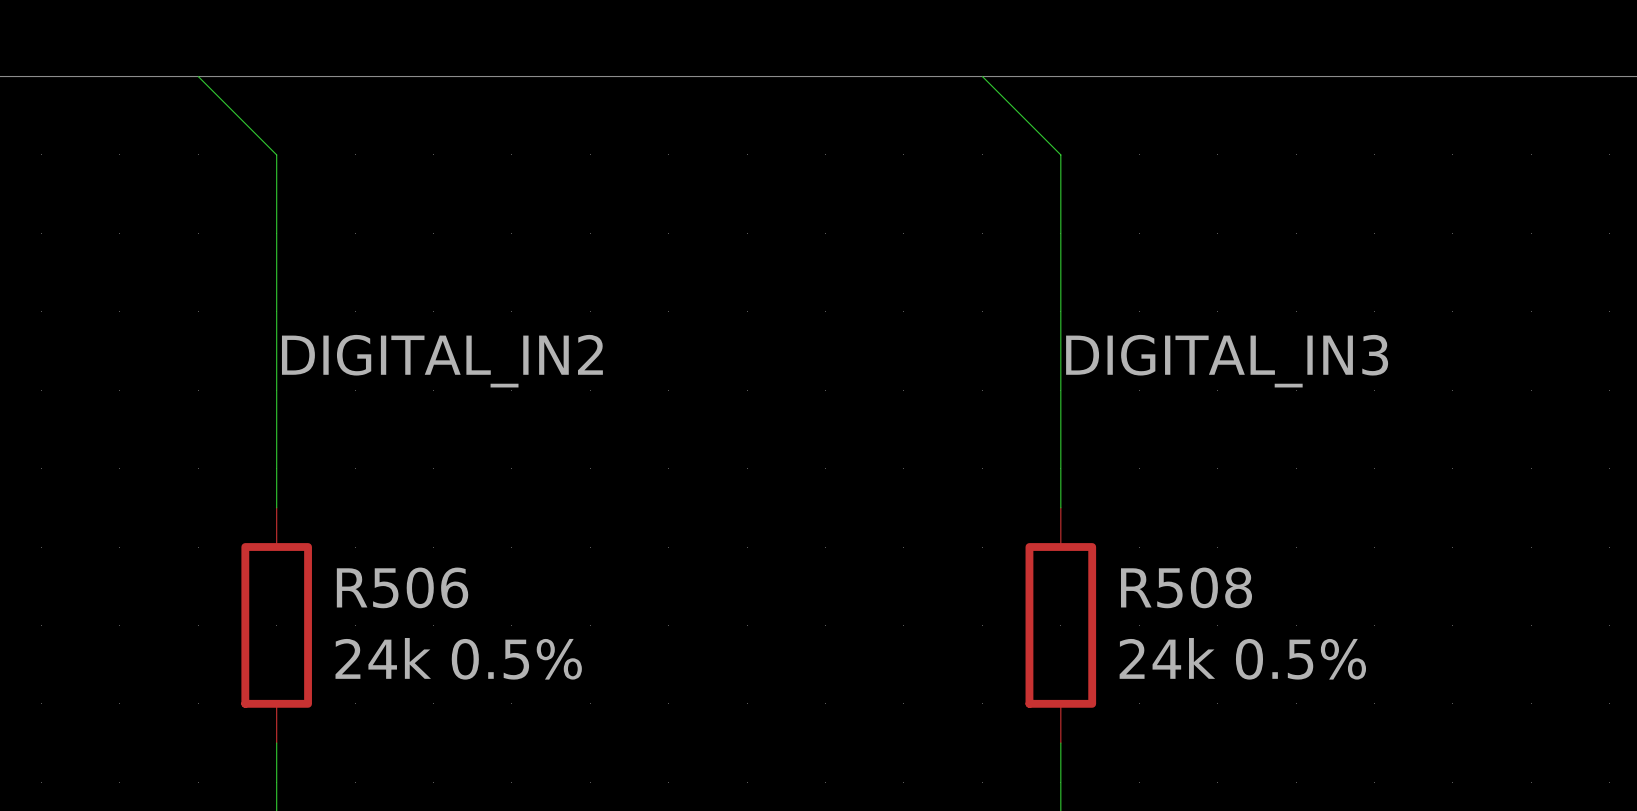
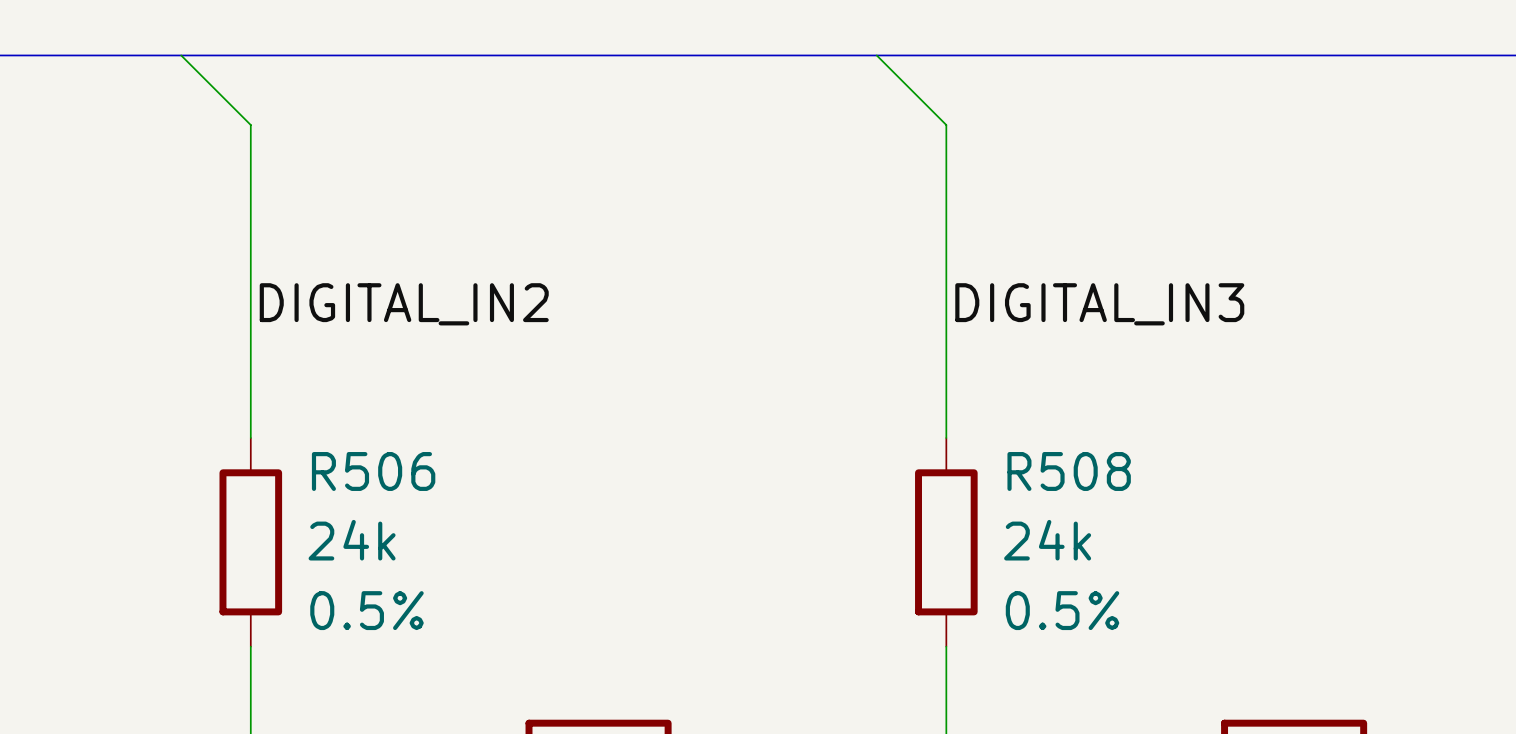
R506 name position: R506 (402, 587) -> R506 (373, 471)
R508 name position: R508 (1186, 587) -> R508 (1069, 471)
R506 value: 24k 0.5% (458, 658) -> 24k (352, 540)
R508 value: 24k 0.5% (1242, 658) -> 24k (1047, 540)
R506 text: none -> 0.5% (366, 610)
R508 text: none -> 0.5% (1062, 610)

